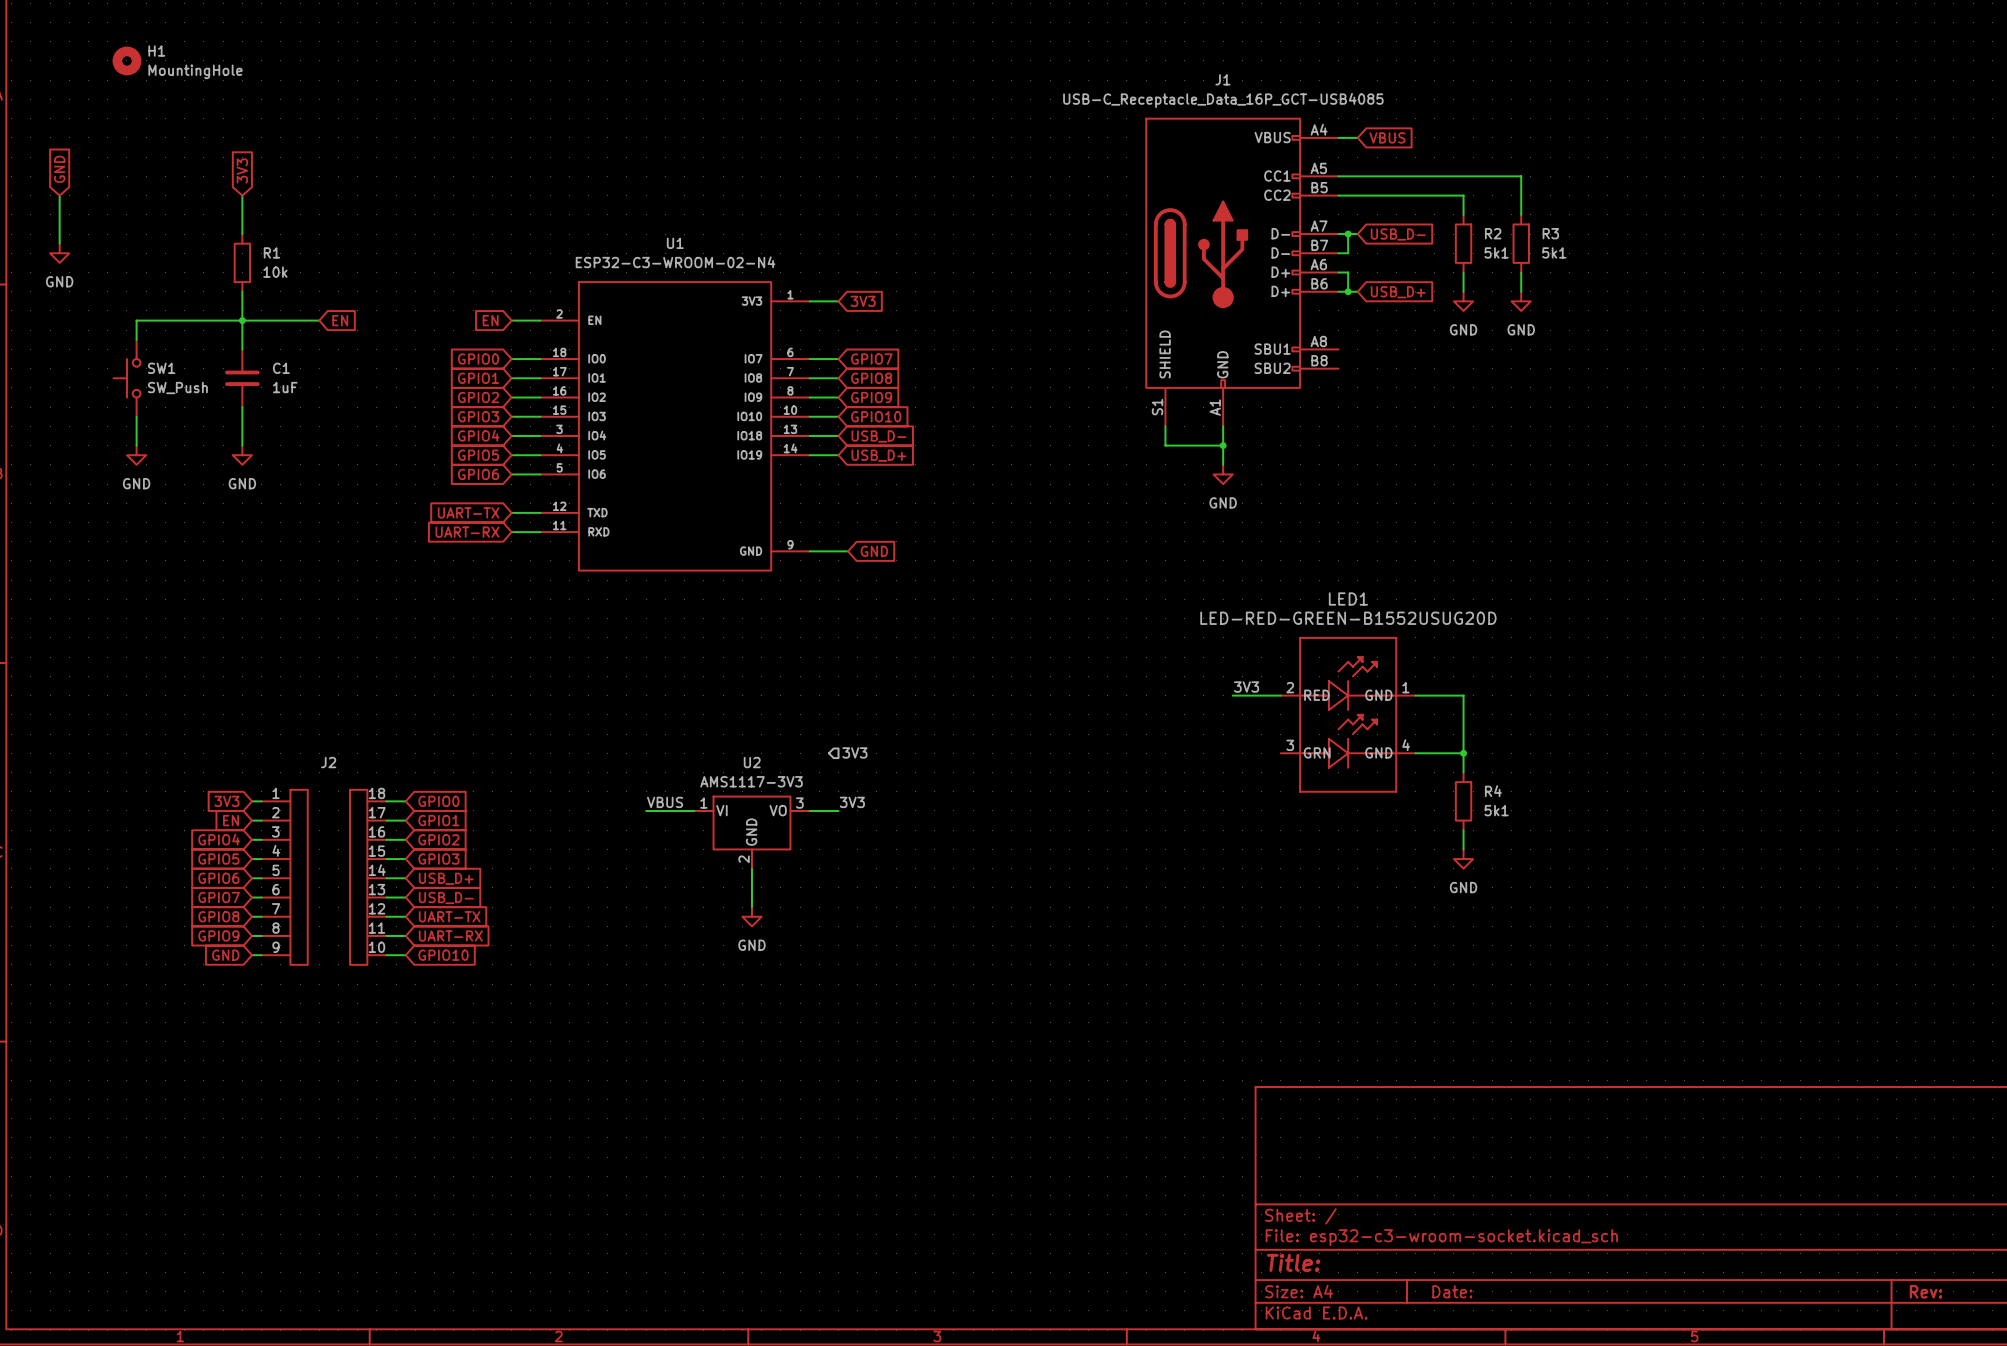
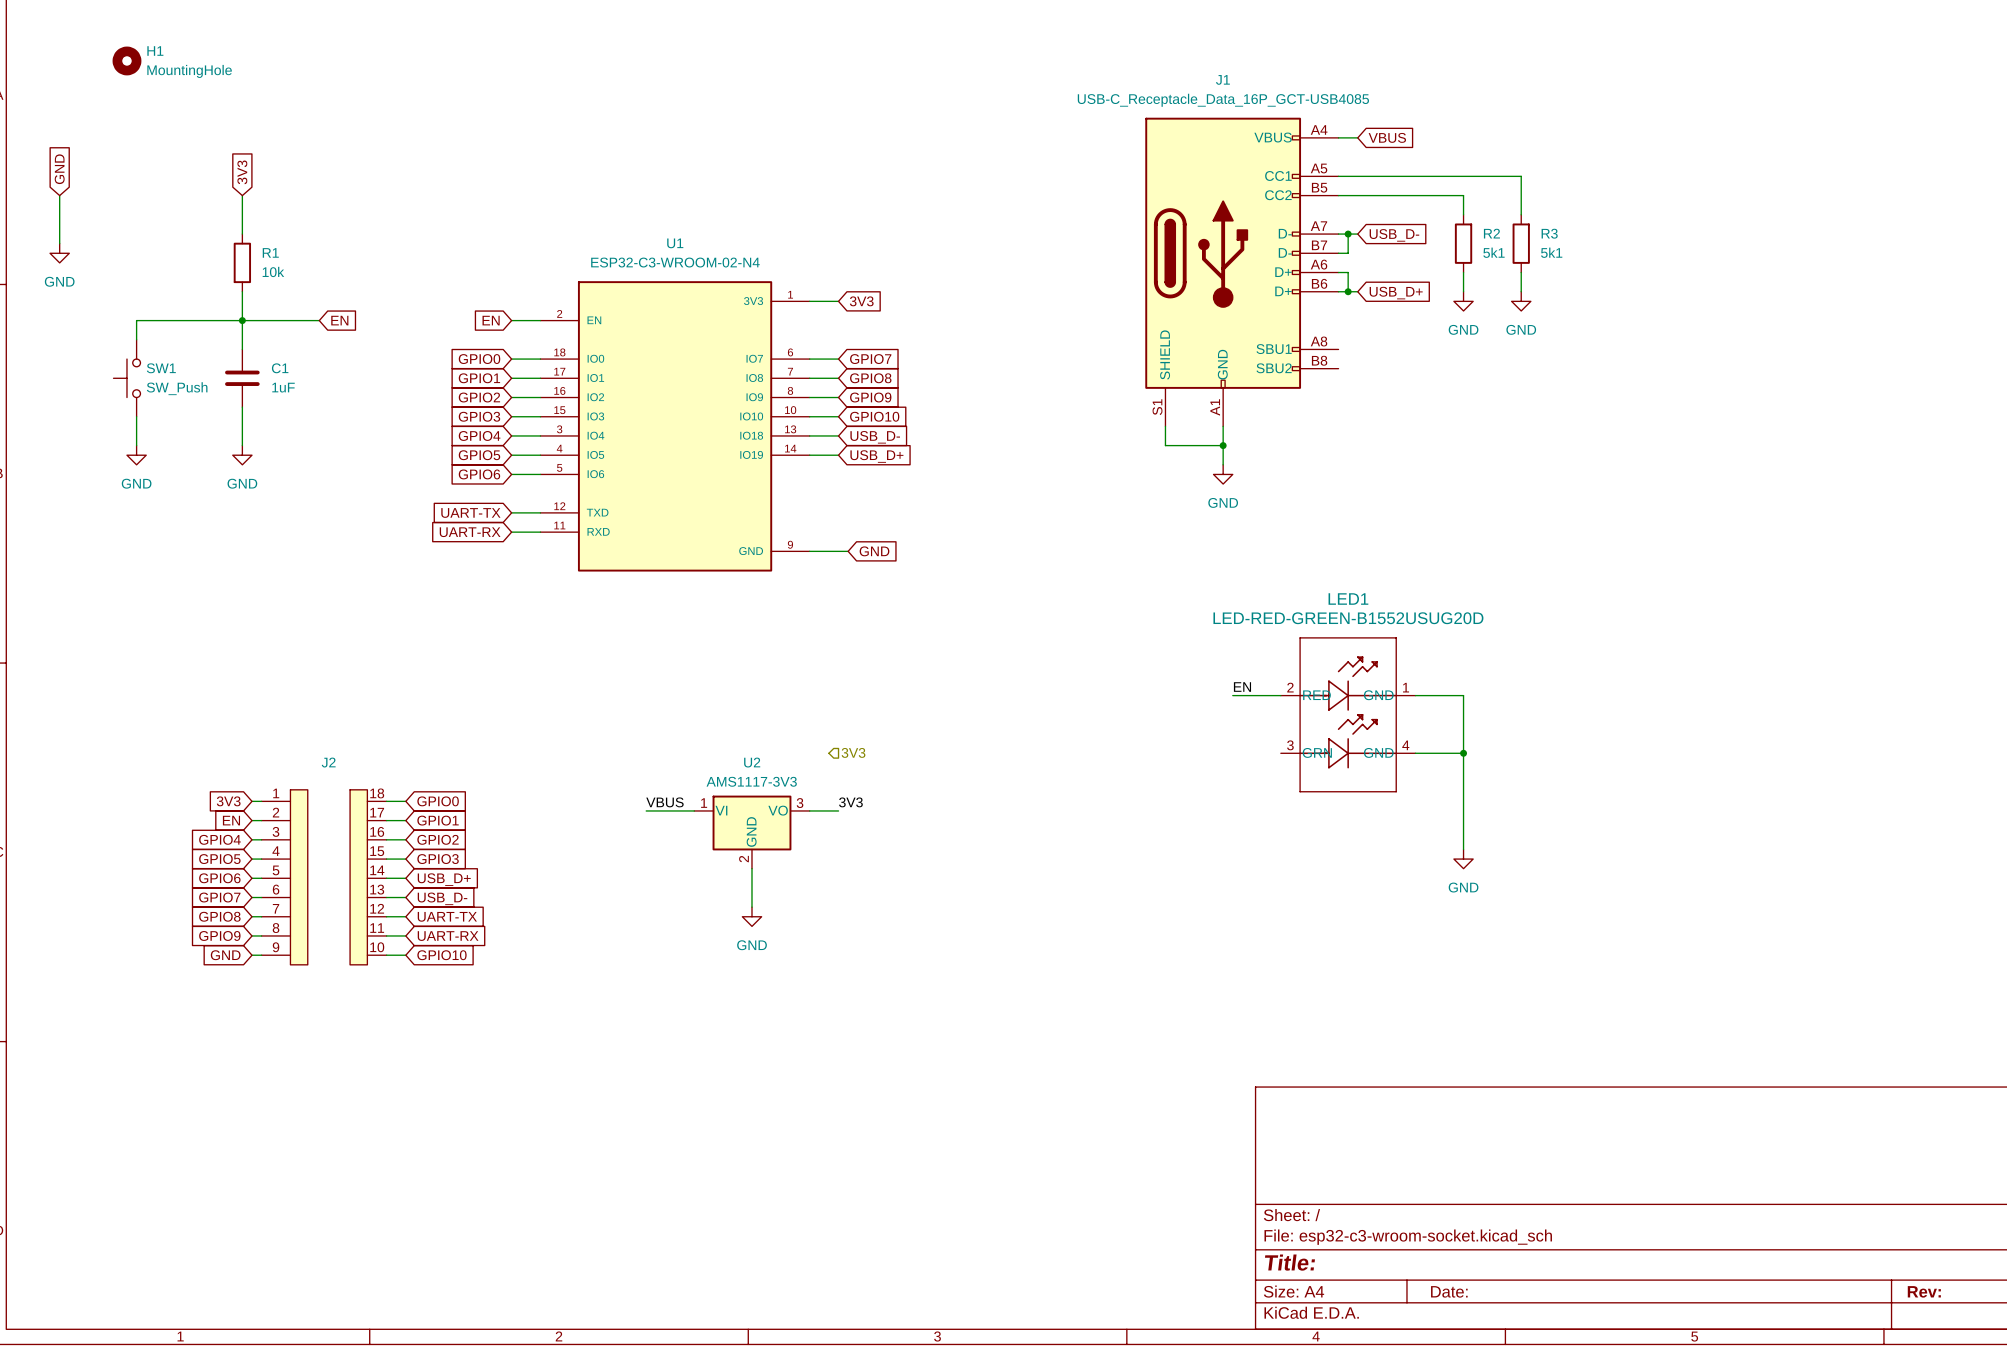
label: 3V3 (1246, 687) -> EN (1242, 687)
wire: none -> (1463, 772) (1463, 830)
R4: 5k1 (1463, 801) -> none

